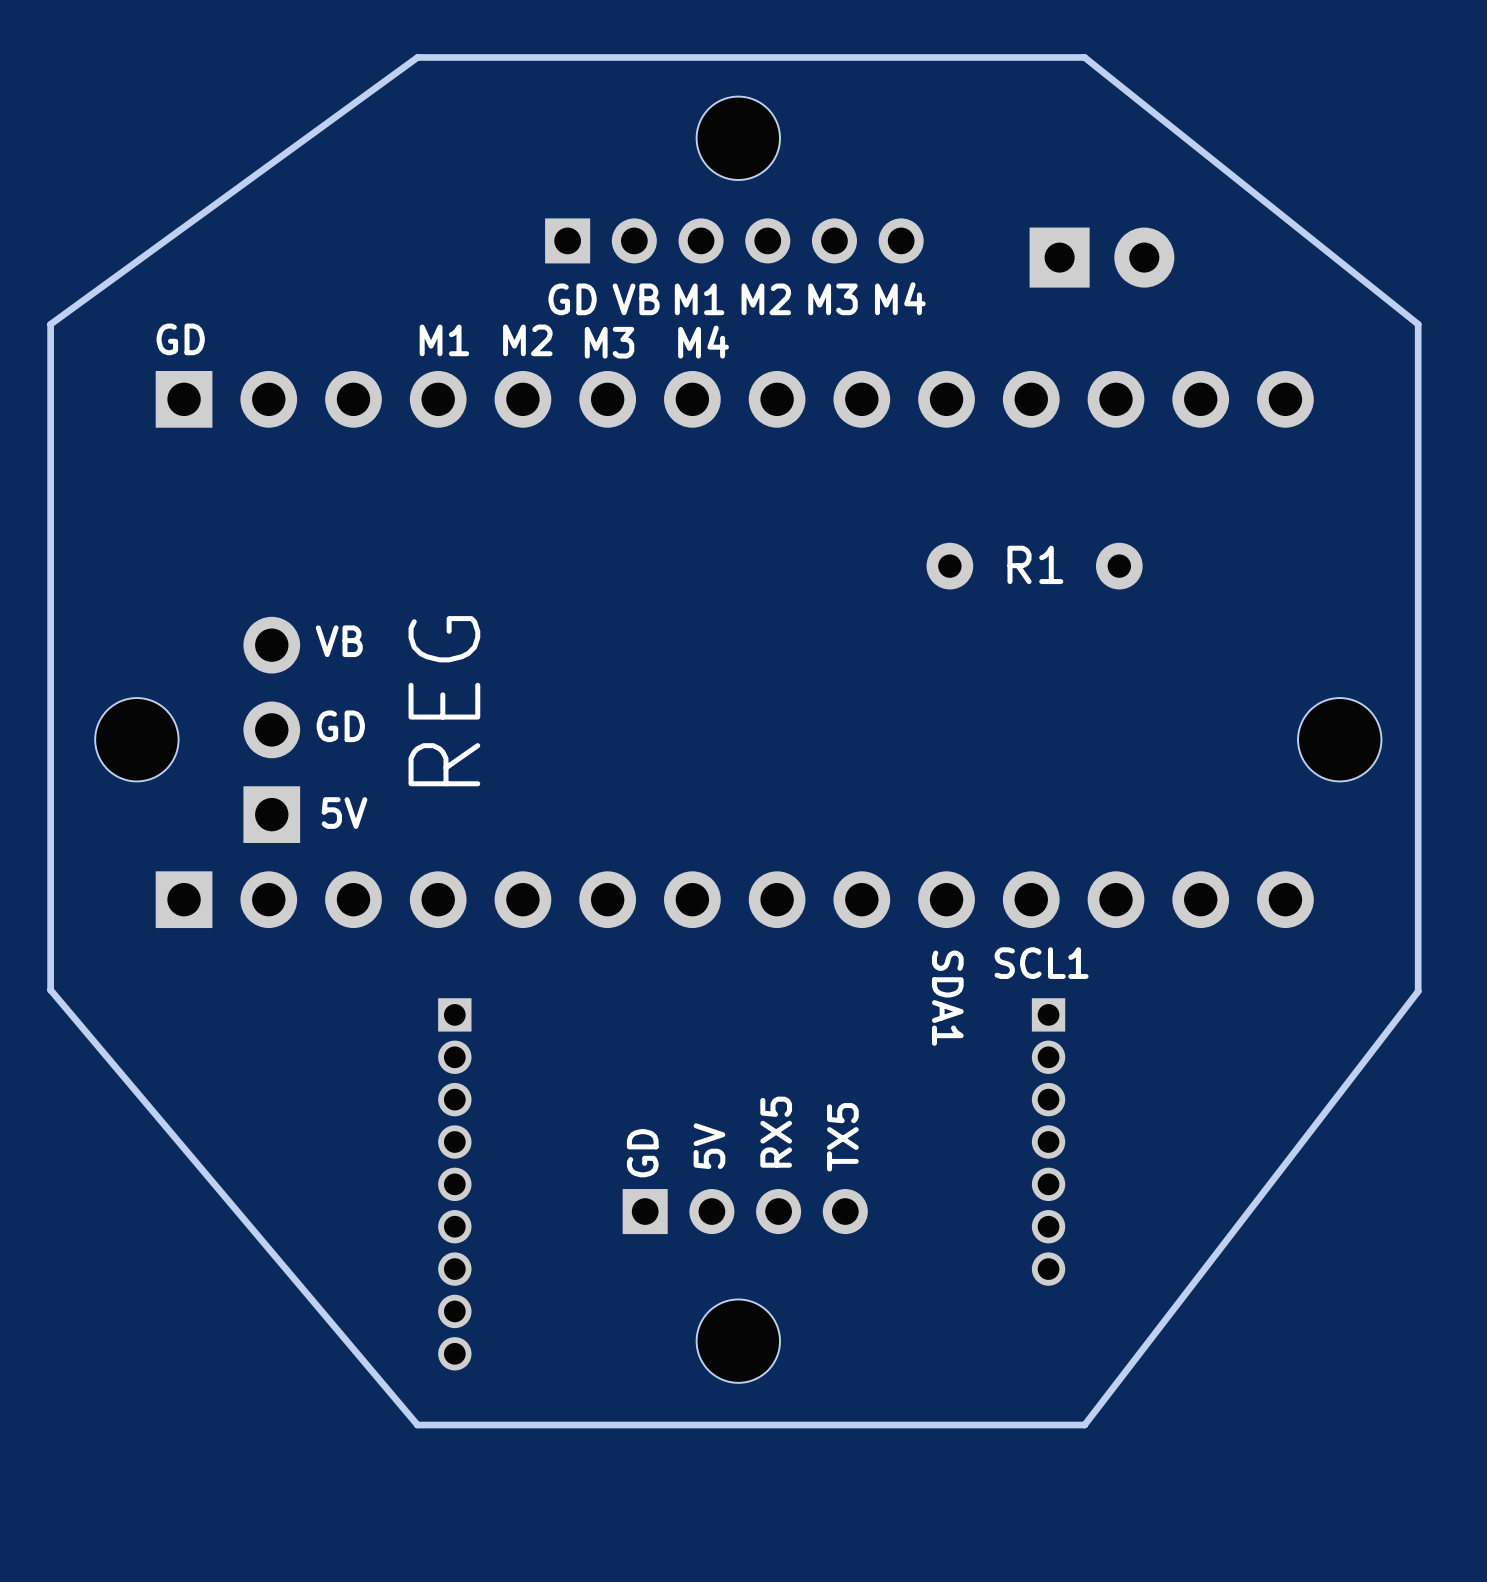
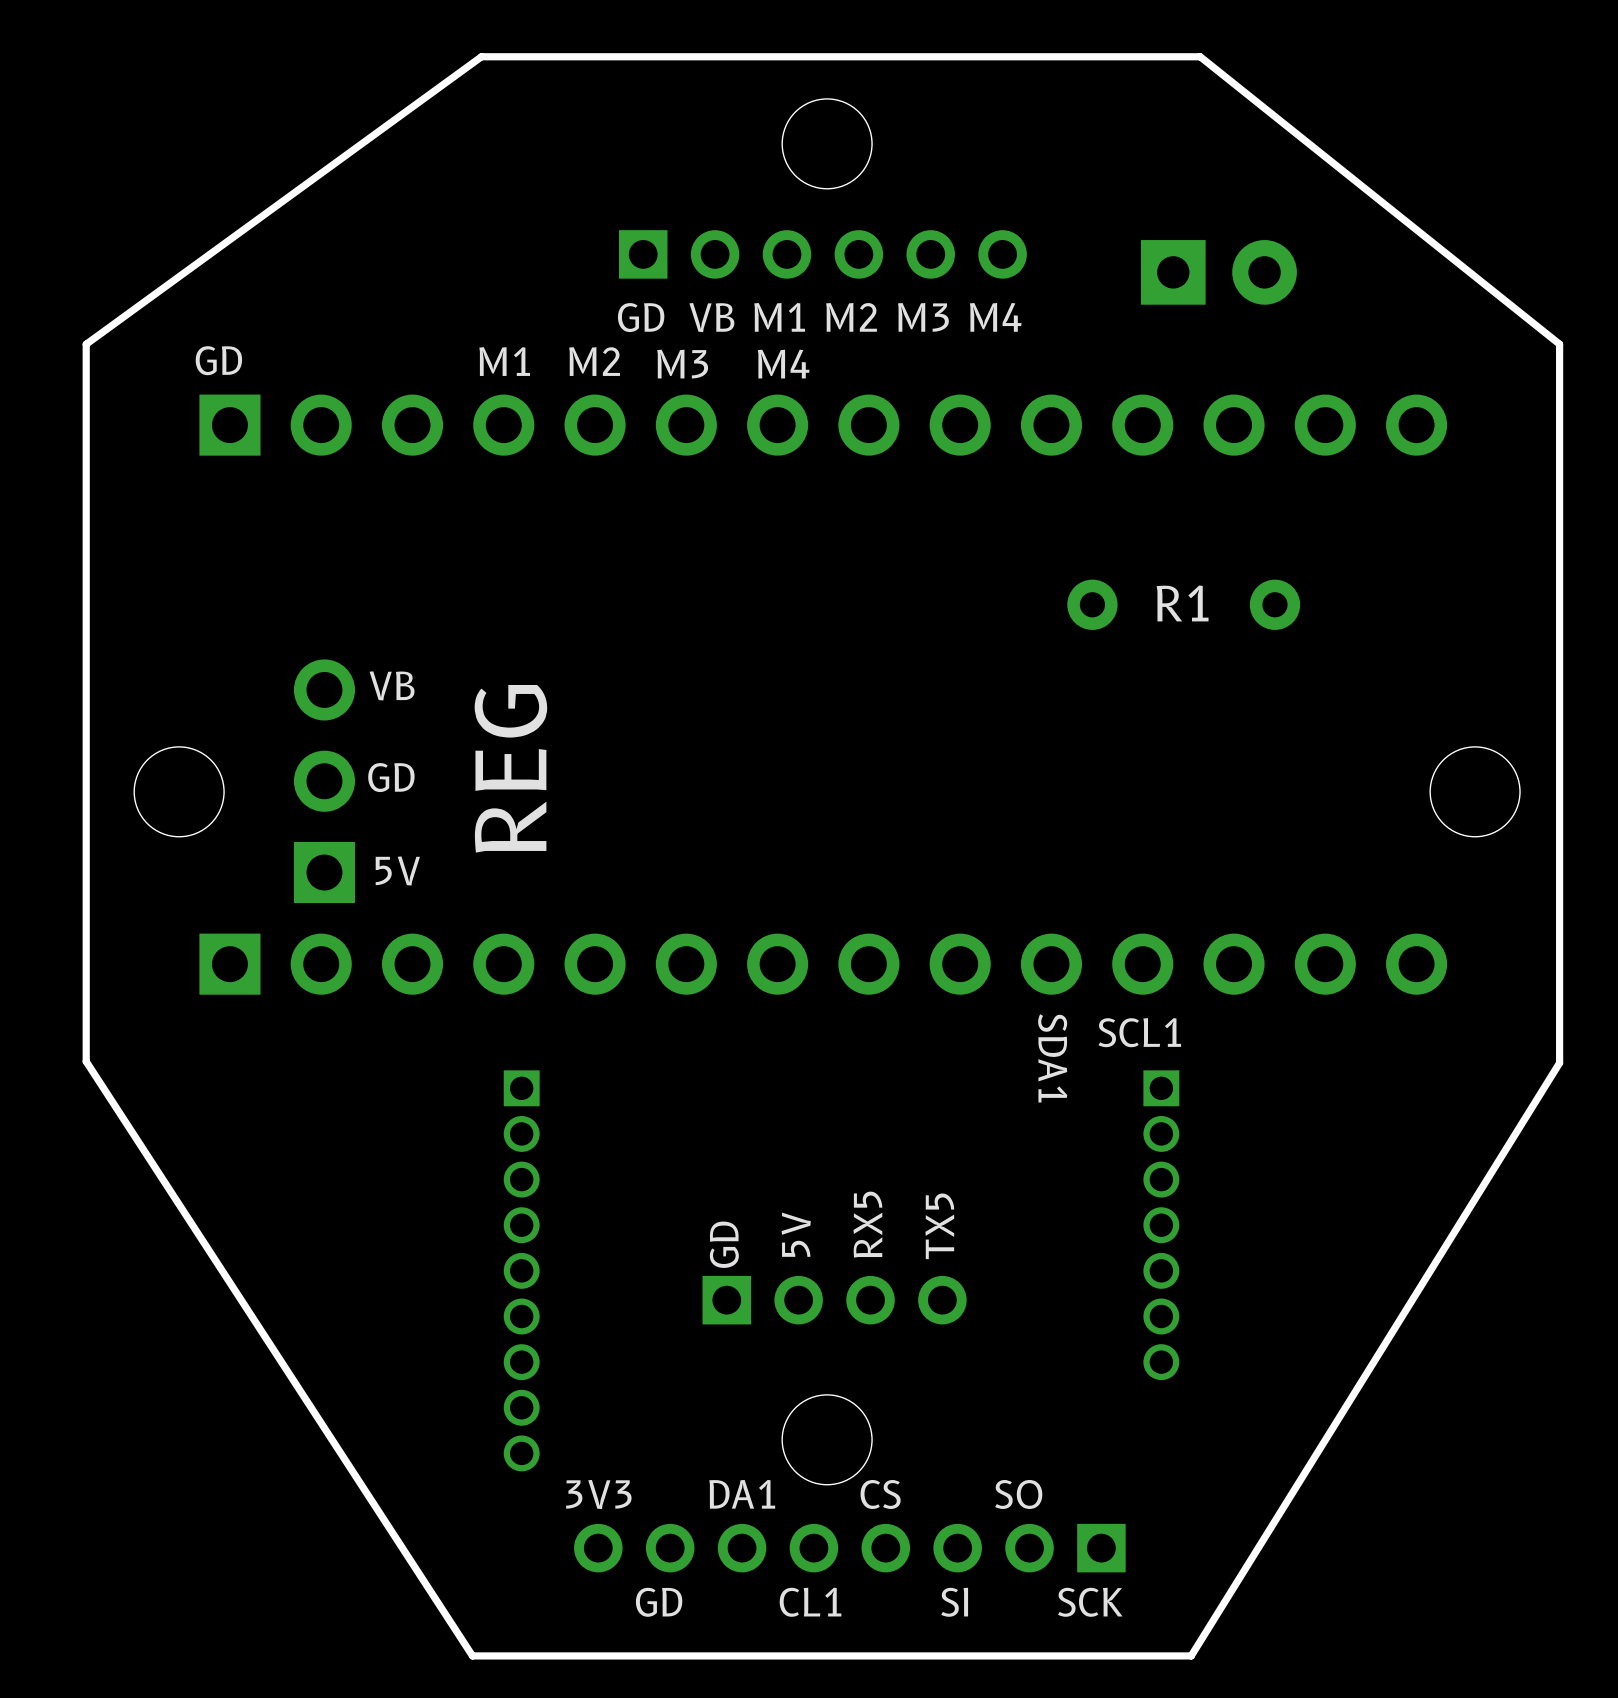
R1 position: (1034, 566) -> (1183, 604)
board edge: (50, 990) (417, 1425) (1084, 1425) (1418, 991) -> (86, 1061) (472, 1655) (1191, 1655) (1559, 1062)
text: none -> 3V3 (598, 1494)
text: none -> DA1 (742, 1494)
text: none -> CS (880, 1494)
text: none -> SO (1018, 1494)
part: none -> (849, 1548)
text: none -> GD (659, 1602)
text: none -> CL1 (810, 1602)
text: none -> SI (954, 1602)
text: none -> SCK (1090, 1602)

